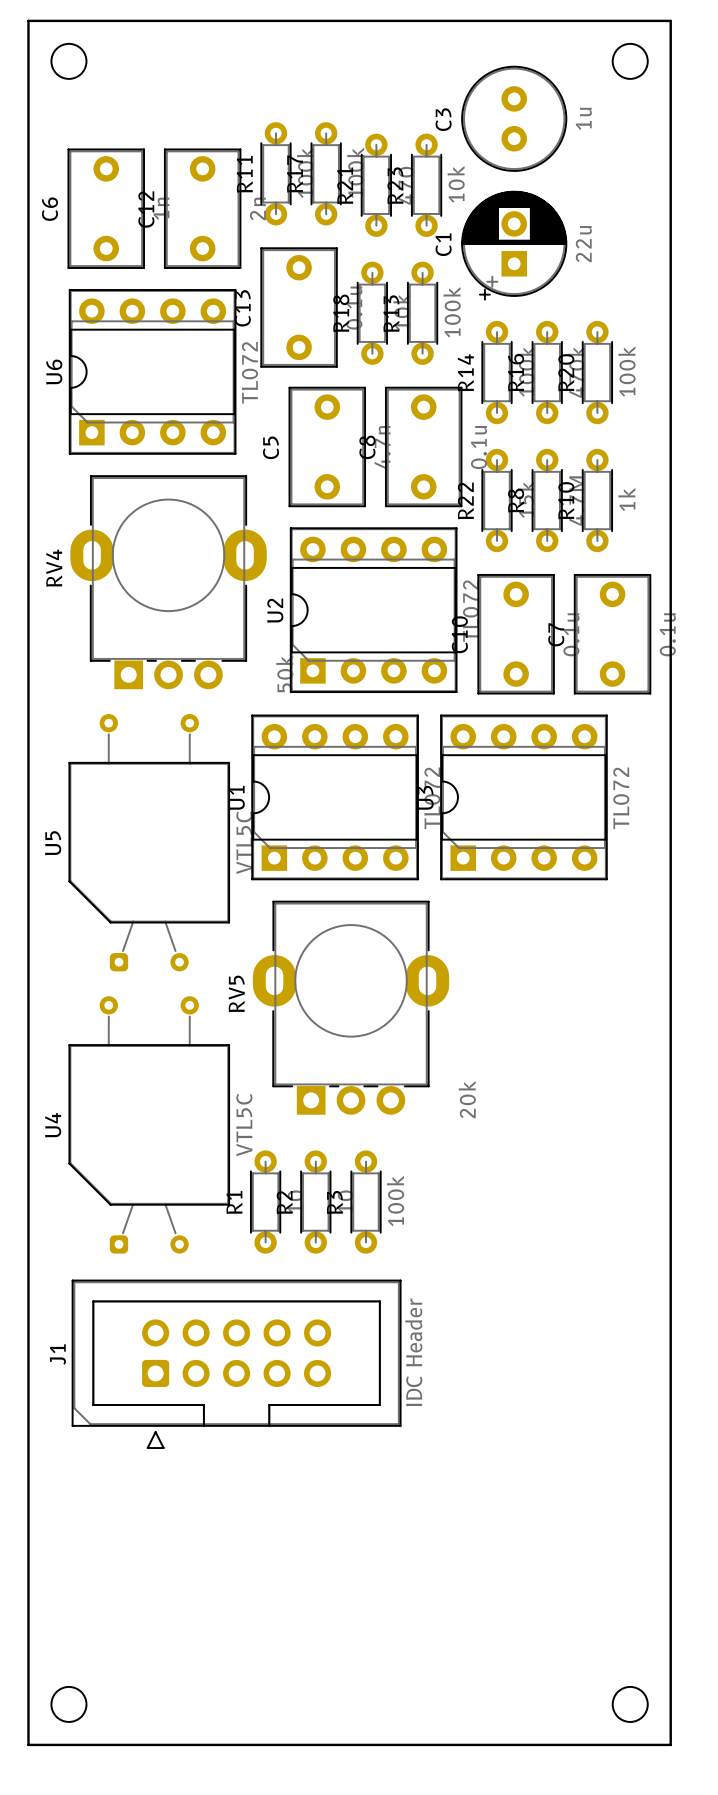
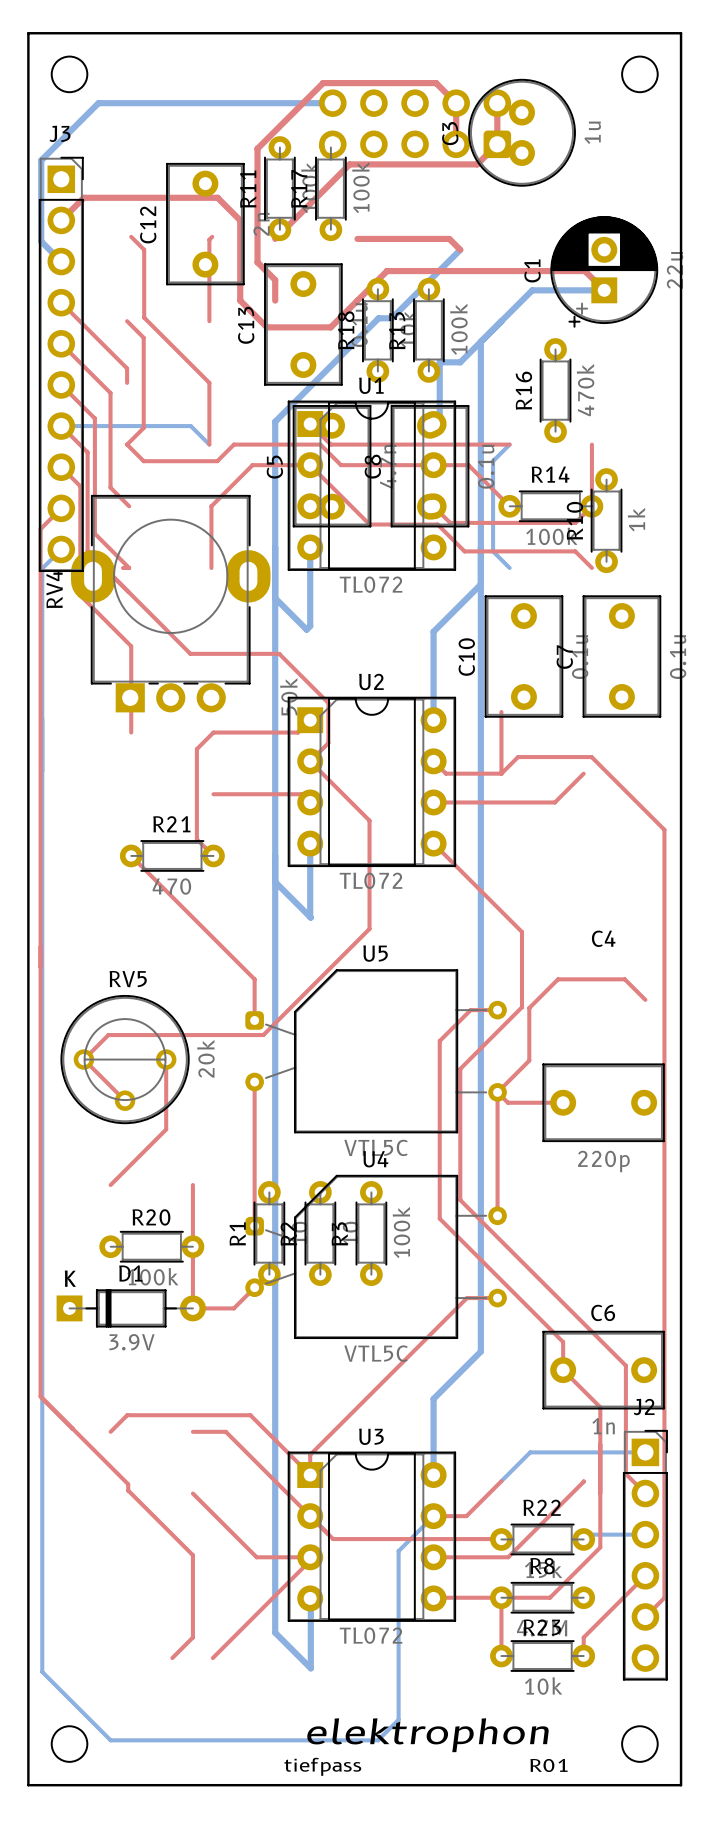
bottom track: none -> (332, 103) (98, 103) (41, 160) (41, 241) (61, 261)
top track: none -> (497, 103) (497, 144) (477, 164) (349, 164) (275, 238)
part: none -> (415, 123)
top track: none -> (456, 144) (456, 103) (436, 83) (323, 83) (257, 148) (257, 262) (275, 280) (275, 300)
R21 rotation: 0° (376, 185) -> 90° clockwise (172, 855)
R21 position: (376, 185) -> (172, 855)
R23 rotation: 0° (426, 185) -> 90° clockwise (542, 1656)
R23 position: (426, 185) -> (542, 1656)
top track: none -> (61, 220) (83, 197) (217, 197) (240, 220) (240, 300) (266, 327) (330, 327) (387, 271) (585, 271) (604, 290)
C6 rotation: 0° (106, 208) -> 90° clockwise (603, 1370)
C6 position: (106, 208) -> (603, 1370)
top track: none -> (131, 236) (144, 249) (144, 317) (209, 382) (209, 444)
top track: none -> (212, 236) (209, 239) (209, 321)
top track: none -> (357, 238) (449, 238) (460, 249)
bottom track: none -> (460, 249) (391, 318) (378, 318) (275, 421) (275, 1632) (310, 1668) (310, 1598)
C1 position: (514, 245) -> (604, 271)
bottom track: none -> (604, 290) (532, 290) (460, 362) (439, 362) (439, 417) (433, 424)
top track: none -> (61, 302) (127, 368) (127, 382)
top track: none -> (127, 321) (143, 337) (143, 427) (127, 444) (143, 461) (217, 461) (233, 444) (320, 444) (341, 465) (468, 465) (509, 506)
bottom track: none -> (480, 341) (480, 1351) (433, 1398) (433, 1474)
top track: none -> (61, 343) (110, 393) (110, 487) (129, 506)
J3: none -> (61, 364)
top track: none -> (61, 384) (94, 418) (94, 533) (129, 568) (123, 568)
U6: TL072 (152, 371) -> none
R14 rotation: 0° (497, 372) -> 90° clockwise (550, 506)
R14 position: (497, 372) -> (550, 506)
R20 rotation: 0° (597, 372) -> 90° clockwise (151, 1246)
R20 position: (597, 372) -> (151, 1246)
top track: none -> (310, 424) (330, 444) (509, 444)
bottom track: none -> (61, 426) (190, 426) (209, 444)
top track: none -> (61, 426) (87, 452) (87, 551) (190, 653) (279, 653) (328, 703) (328, 743) (310, 761) (369, 820) (369, 928) (263, 1035) (108, 1035) (83, 1059) (125, 1100)
bottom track: none -> (509, 444) (493, 461) (493, 551) (509, 568)
top track: none -> (591, 444) (591, 506) (575, 522) (450, 522) (433, 506)
top track: none -> (61, 467) (80, 486) (80, 595) (131, 646) (131, 732)
top track: none -> (61, 508) (40, 529) (40, 1396) (128, 1484) (128, 1490) (192, 1555) (192, 1637) (172, 1658)
R22 rotation: 0° (497, 500) -> 90° clockwise (542, 1539)
R22 position: (497, 500) -> (542, 1539)
R8 rotation: 0° (547, 500) -> 90° clockwise (542, 1597)
R8 position: (547, 500) -> (542, 1597)
bottom track: none -> (310, 547) (310, 626) (306, 629) (275, 598)
bottom track: none -> (61, 549) (42, 568) (42, 1671) (110, 1740) (378, 1740) (398, 1719) (398, 1551) (433, 1516)
top track: none -> (211, 568) (211, 506) (252, 465) (310, 465) (369, 524) (437, 524) (464, 551) (575, 551) (591, 568)
bottom track: none -> (480, 584) (433, 631) (433, 720)
U2 rotation: 0° (373, 610) -> 90° clockwise (371, 781)
U2 position: (373, 610) -> (371, 781)
top track: none -> (501, 711) (501, 773)
top track: none -> (310, 720) (297, 732) (213, 732) (196, 749) (196, 839) (213, 855)
top track: none -> (433, 761) (445, 773) (501, 773)
top track: none -> (501, 773) (518, 757) (591, 757) (664, 829) (664, 1597) (645, 1616)
top track: none -> (583, 773) (554, 802) (433, 802)
top track: none -> (213, 794) (301, 794) (310, 802)
U1 rotation: 0° (335, 797) -> 90° clockwise (371, 485)
U1 position: (335, 797) -> (371, 485)
U3 rotation: 0° (523, 797) -> 90° clockwise (371, 1536)
U3 position: (523, 797) -> (371, 1536)
bottom track: none -> (310, 843) (310, 917)
top track: none -> (433, 843) (522, 931) (522, 1007) (460, 1068) (460, 1200) (625, 1365) (625, 1474) (645, 1493)
top track: none -> (131, 855) (254, 979) (254, 1020)
U5 rotation: 0° (149, 842) -> 90° clockwise (376, 1051)
U5 position: (149, 842) -> (376, 1051)
bottom track: none -> (275, 882) (310, 917)
RV5 footprint: [252, 900, 450, 1115] -> [60, 994, 190, 1125]
top track: none -> (645, 999) (624, 979) (558, 979) (529, 1008) (529, 1060) (497, 1092)
top track: none -> (497, 1010) (470, 1010) (439, 1041) (439, 1218) (563, 1342) (563, 1370) (600, 1407) (600, 1547) (550, 1597) (433, 1598)
RV5 name position: RV5 (236, 993) -> RV5 (128, 979)
top track: none -> (166, 1059) (166, 1129) (110, 1185)
top track: none -> (254, 1082) (254, 1226)
top track: none -> (497, 1092) (497, 1215)
top track: none -> (497, 1092) (507, 1102) (563, 1102)
C4: none -> 220p (603, 1102)
RV5 value position: 20k (467, 1099) -> 20k (205, 1058)
U4 rotation: 0° (149, 1124) -> 90° clockwise (376, 1256)
U4 position: (149, 1124) -> (376, 1256)
top track: none -> (192, 1185) (192, 1308) (233, 1308) (254, 1287)
top track: none -> (497, 1298) (466, 1298) (310, 1454) (310, 1475) (250, 1415) (127, 1415) (110, 1431)
D1: none -> 3.9V (131, 1308)
J1: IDC Header (236, 1364) -> none
top track: none -> (192, 1431) (225, 1431) (333, 1539) (501, 1539)
bottom track: none -> (645, 1452) (530, 1452) (501, 1481)
top track: none -> (501, 1481) (466, 1516) (433, 1516)
top track: none -> (583, 1481) (508, 1557) (433, 1557)
top track: none -> (192, 1493) (256, 1557) (310, 1557) (310, 1560) (212, 1658)
bottom track: none -> (645, 1534) (588, 1534) (583, 1539)
J2: none -> (645, 1555)
top track: none -> (645, 1575) (583, 1637) (583, 1656)
top track: none -> (501, 1597) (501, 1656)
drawing: none -> [284, 1718, 568, 1776]

